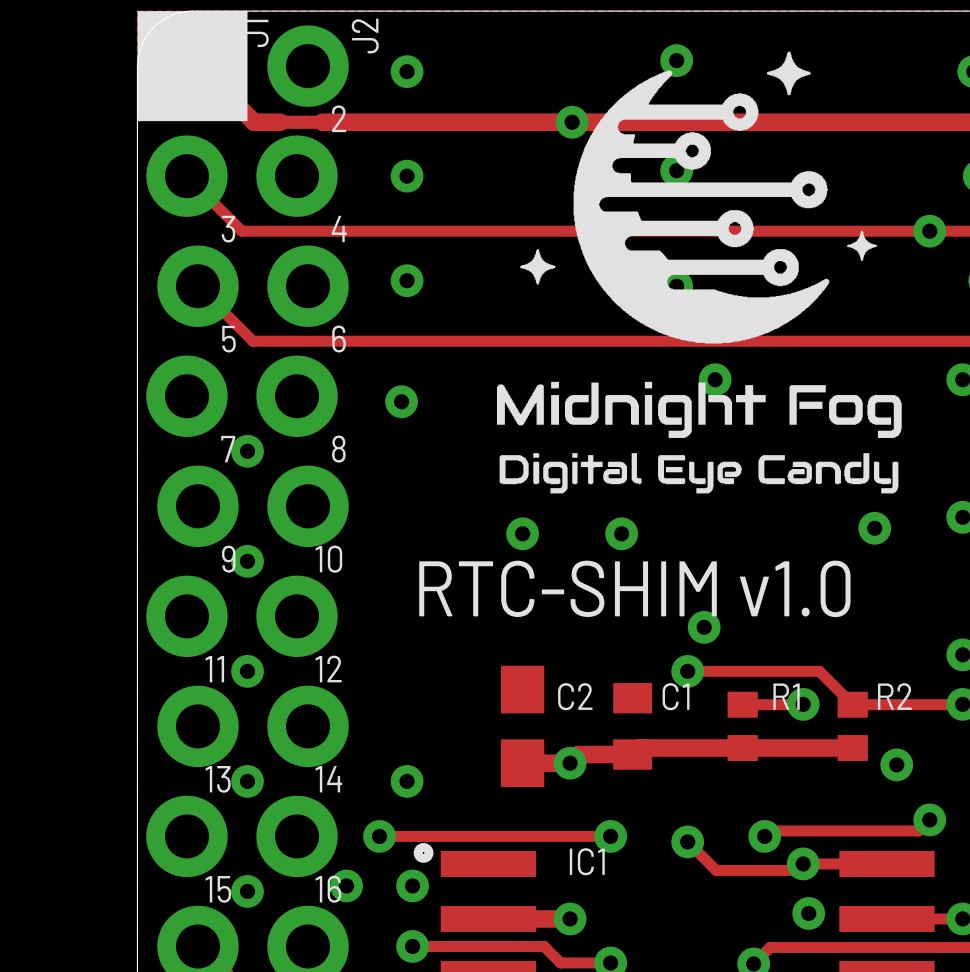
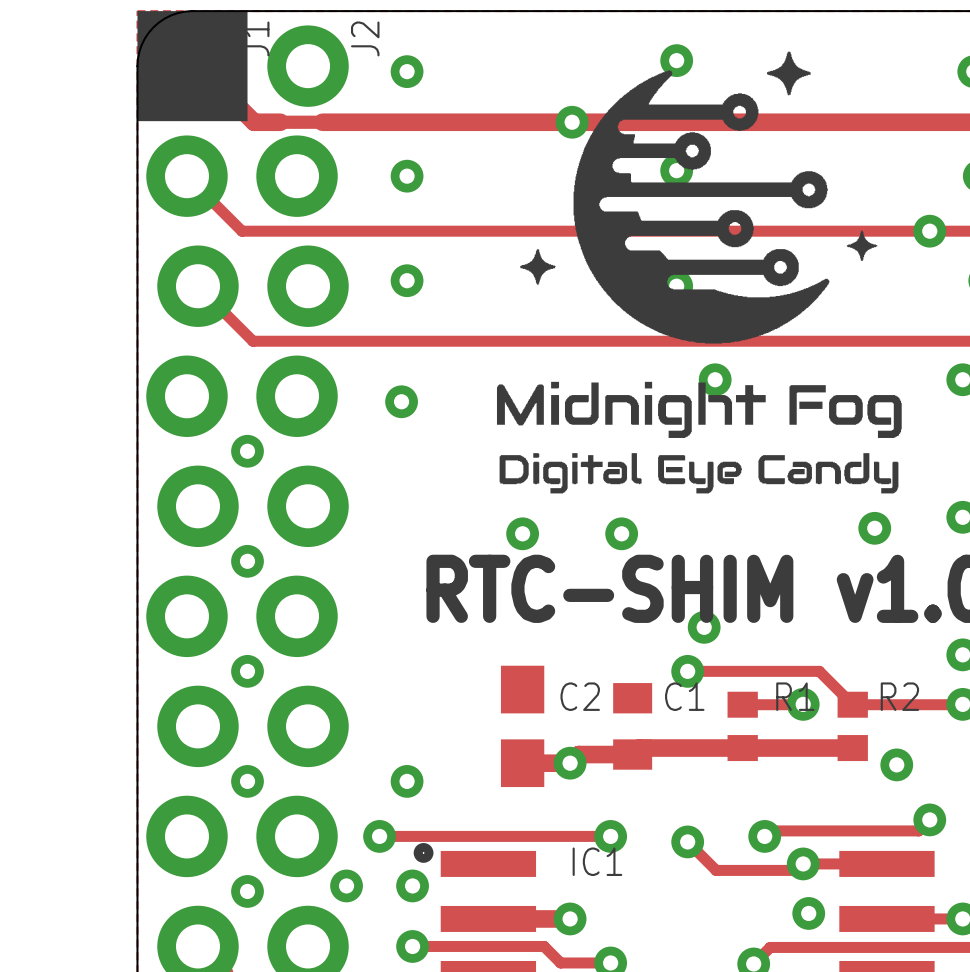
text: 2 (339, 118) -> none
text: 4 (339, 228) -> none
text: 3 (228, 229) -> none
text: 5 (228, 339) -> none
text: 6 (339, 339) -> none
text: 7 (228, 449) -> none
text: 8 (338, 449) -> none
text: 9 (228, 559) -> none
text: 10 (328, 559) -> none
text: 11 (214, 669) -> none
text: 12 (328, 669) -> none
text: 13 (218, 779) -> none
text: 14 (328, 779) -> none
text: 15 (218, 889) -> none
text: 16 (328, 889) -> none

